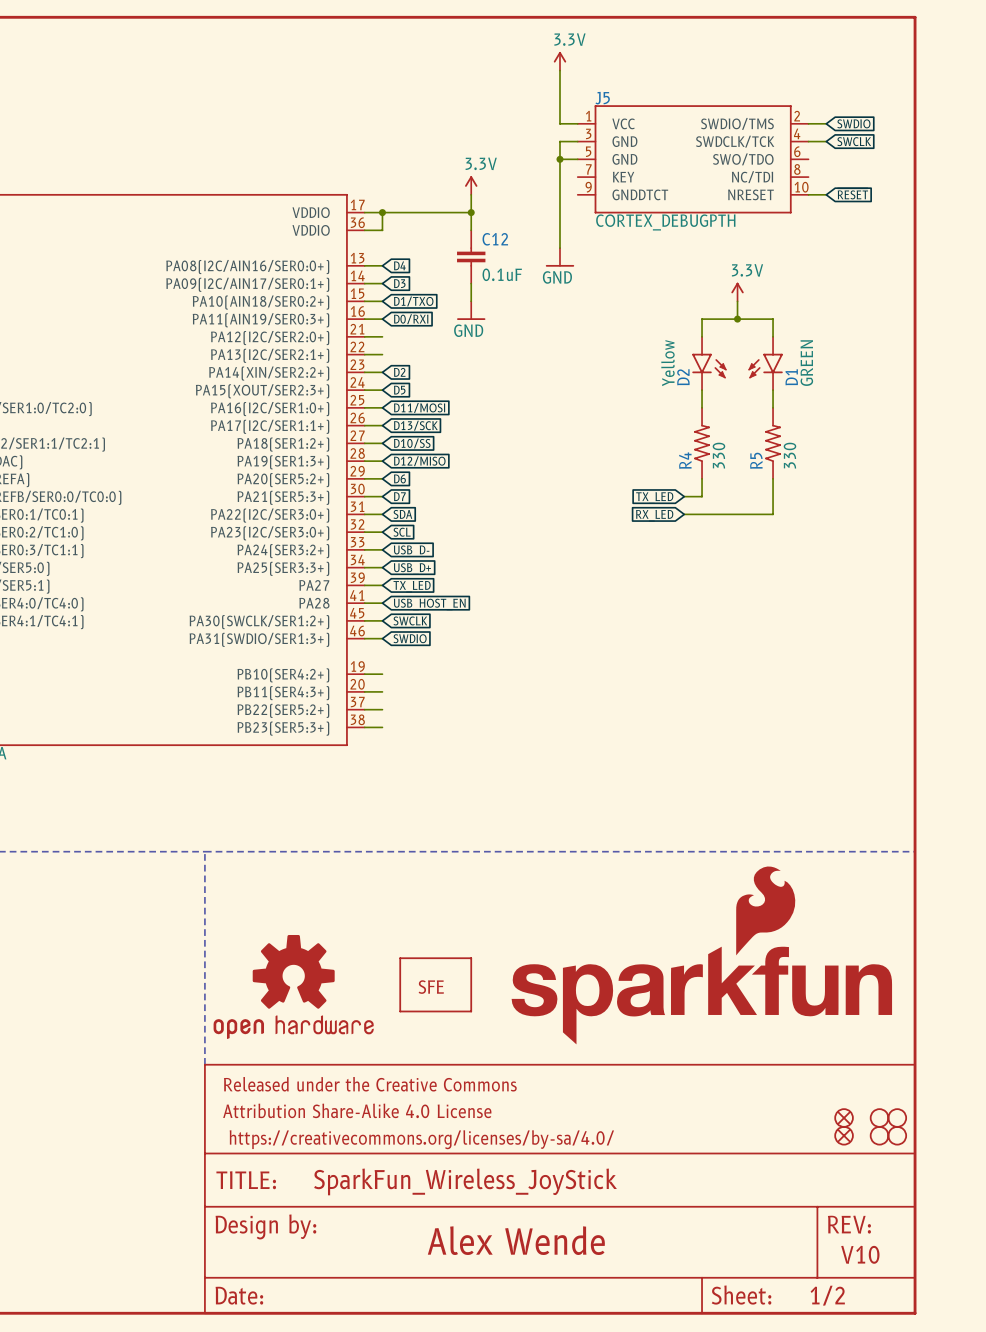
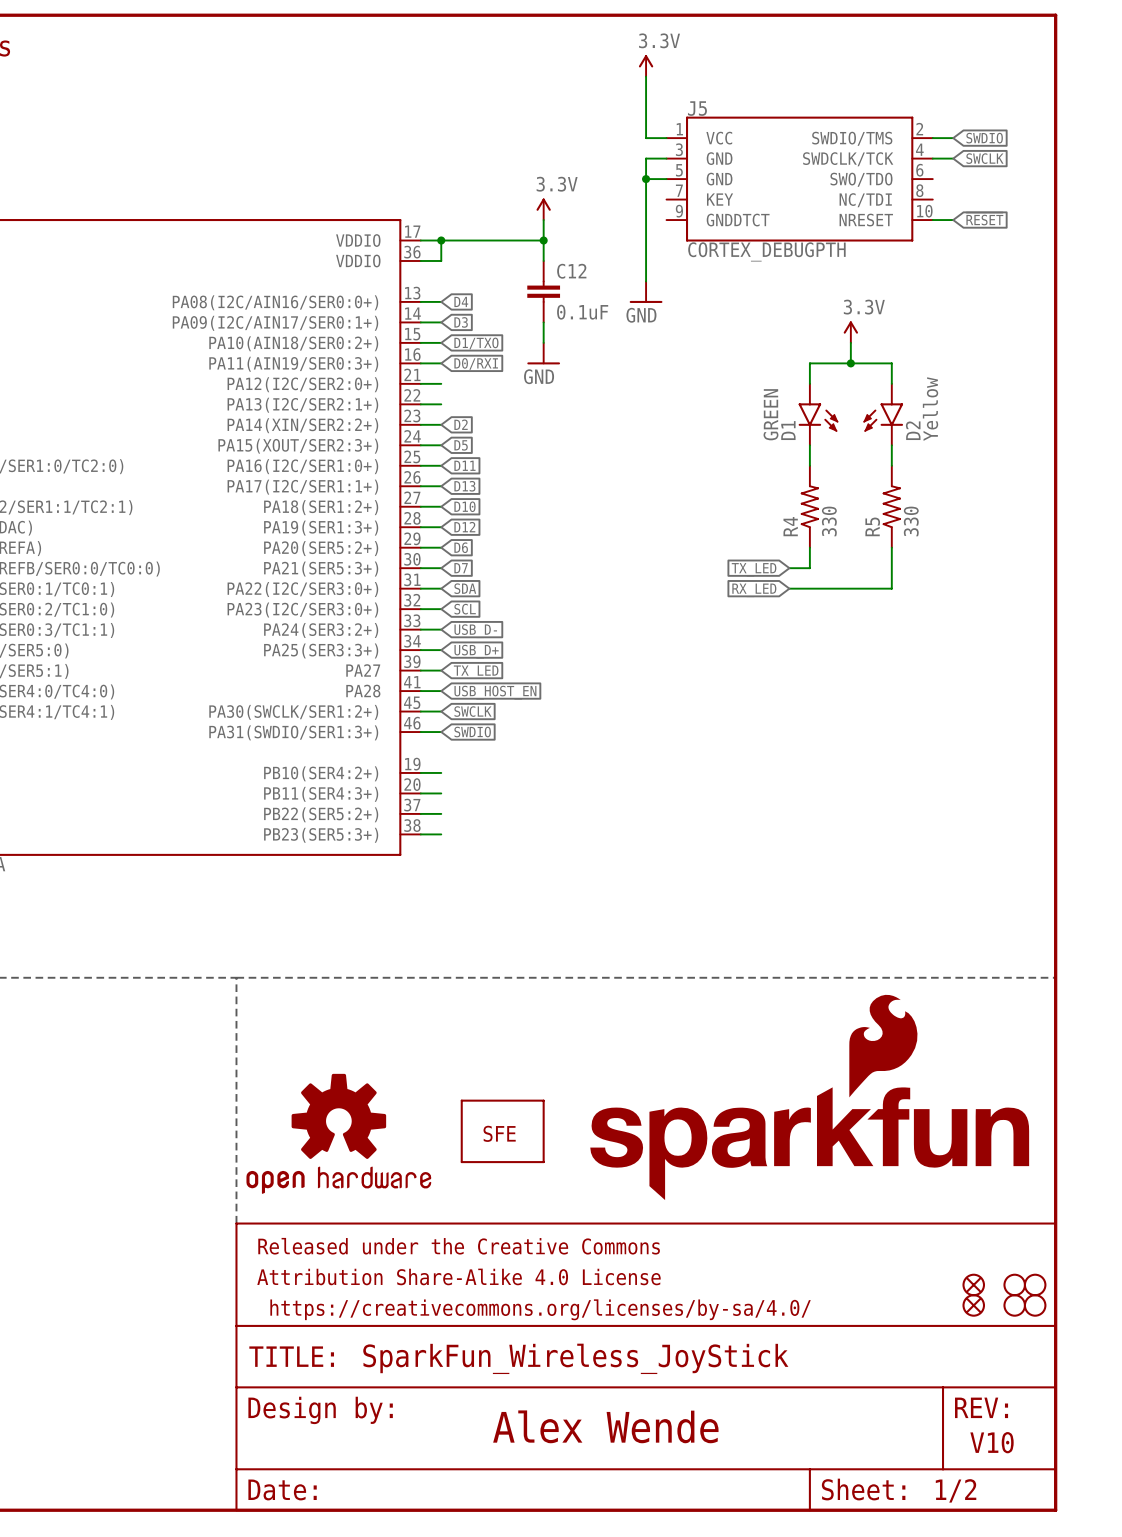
D2 value: Yellow (667, 363) -> GREEN (771, 414)
D1 value: GREEN (806, 363) -> Yellow (930, 409)
D2 name: D2 (683, 377) -> D1 (788, 430)
D1 name: D1 (791, 377) -> D2 (913, 430)
global label: D11/MOSI (419, 407) -> D11 (464, 465)
global label: D13/SCK (415, 425) -> D13 (464, 486)
global label: D10/SS (412, 443) -> D10 (464, 506)
global label: D12/MISO (419, 461) -> D12 (464, 527)

